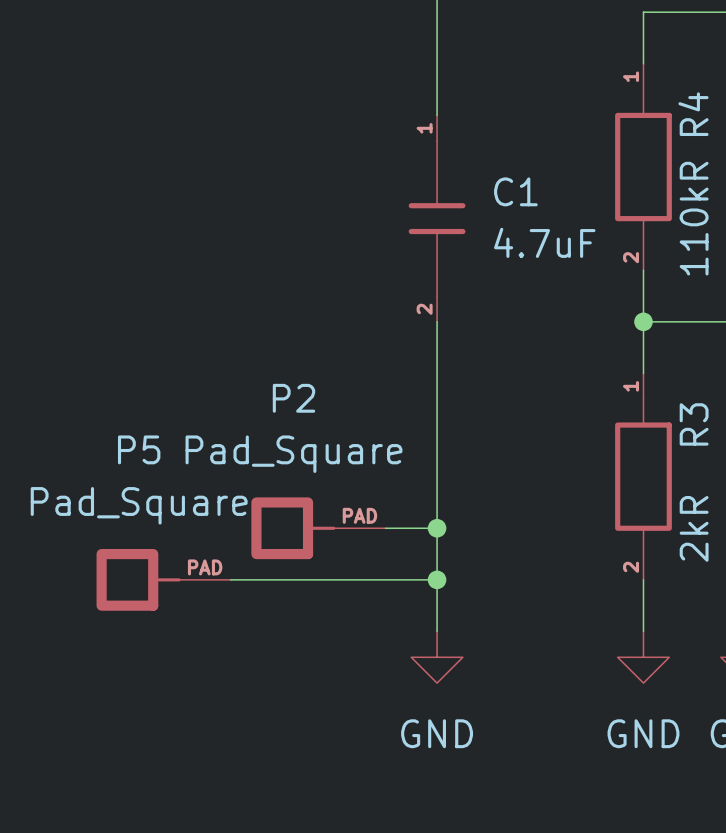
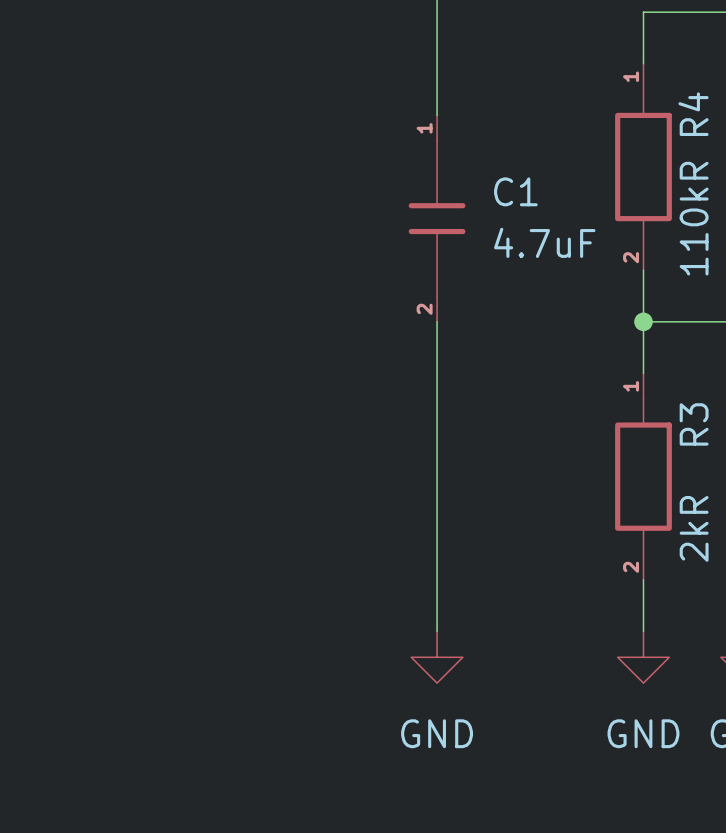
P2: Pad_Square (318, 528) -> none
wire: (385, 528) (437, 528) -> none
junction: (437, 528) -> none
P5: Pad_Square (163, 579) -> none
wire: (230, 579) (437, 579) -> none
junction: (437, 579) -> none

